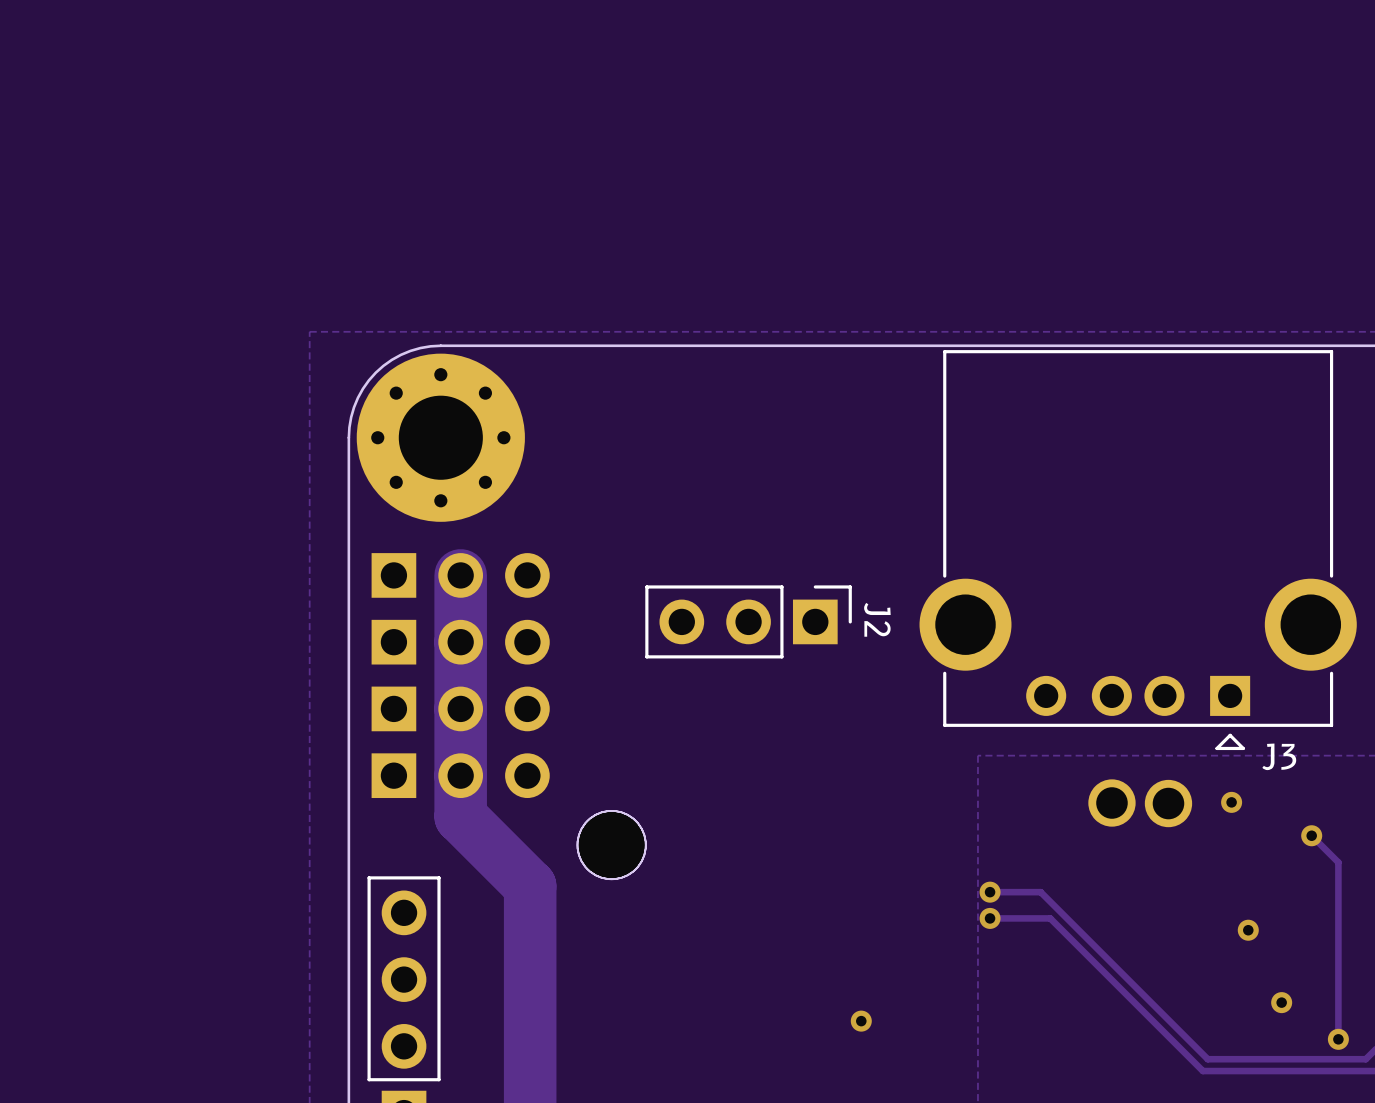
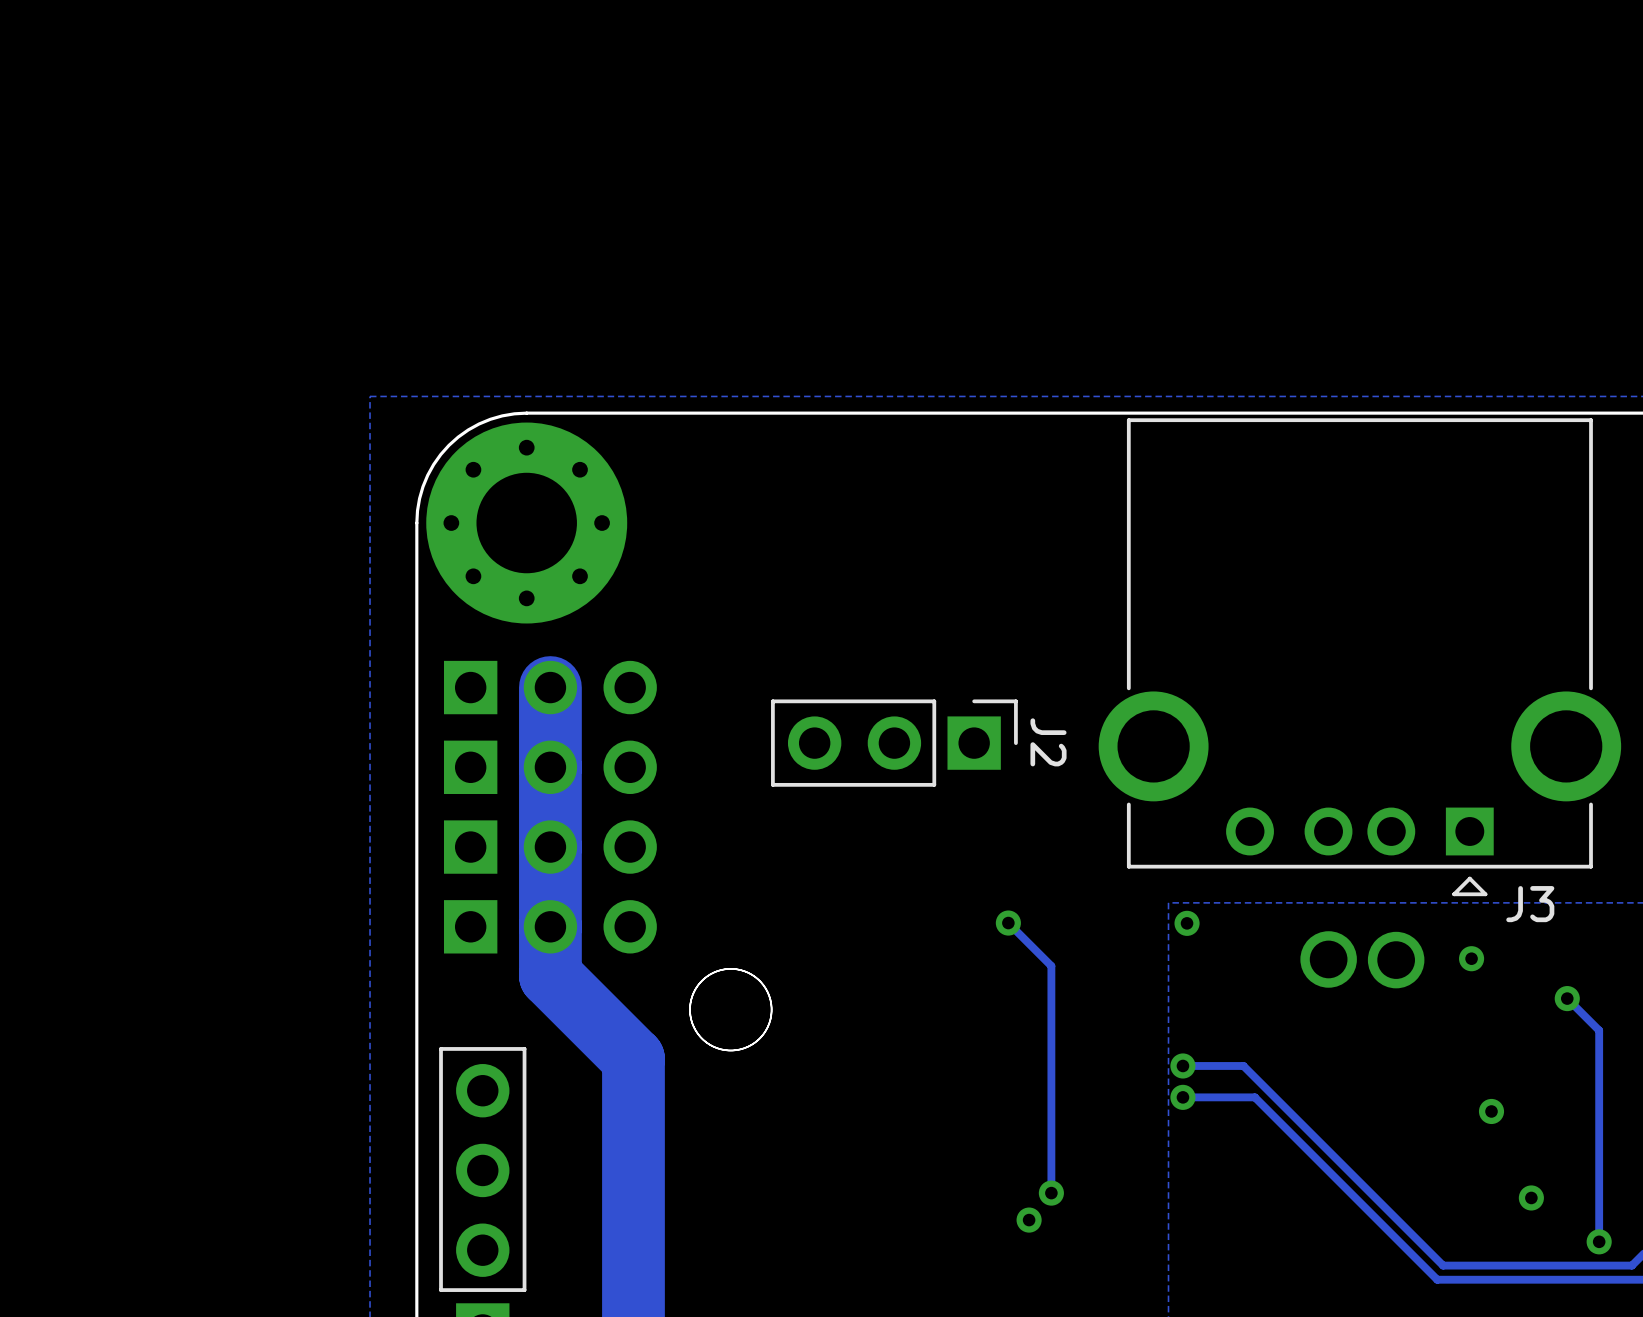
track: none -> (1008, 923) (1051, 966) (1051, 1193)
via: none -> (1008, 923)
via: none -> (1187, 923)
via: none -> (1051, 1193)

